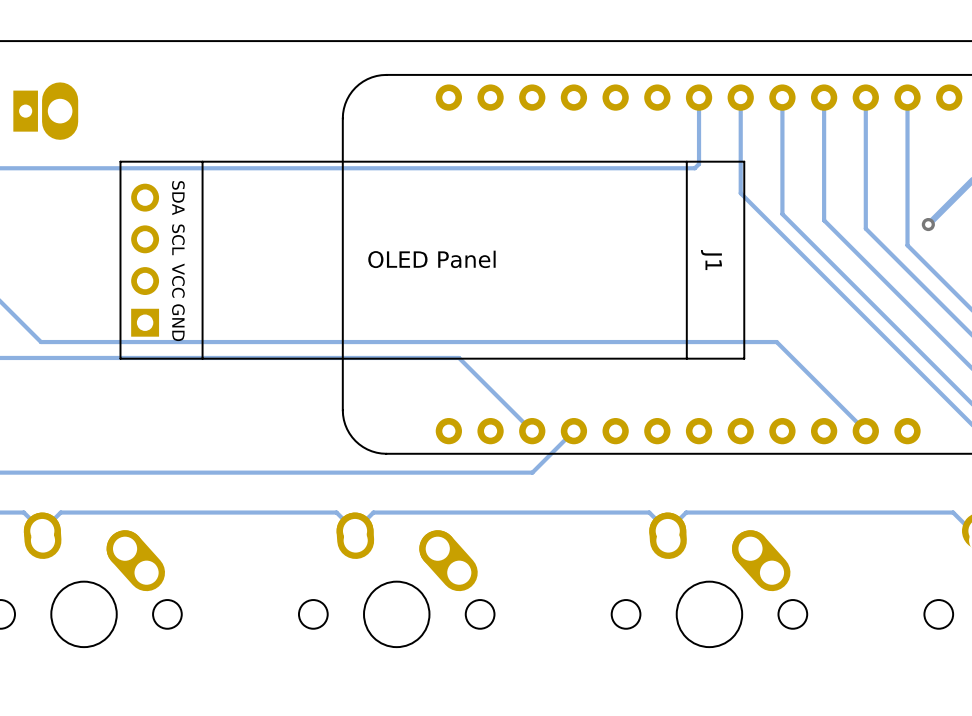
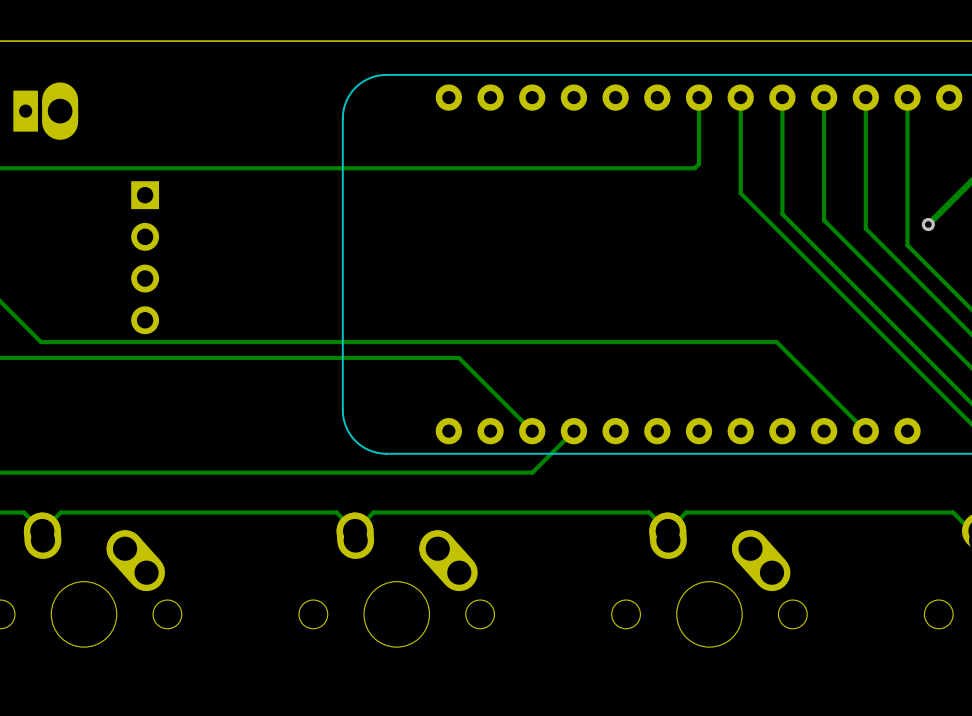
J1 side: bottom (432, 260) -> top (145, 257)

